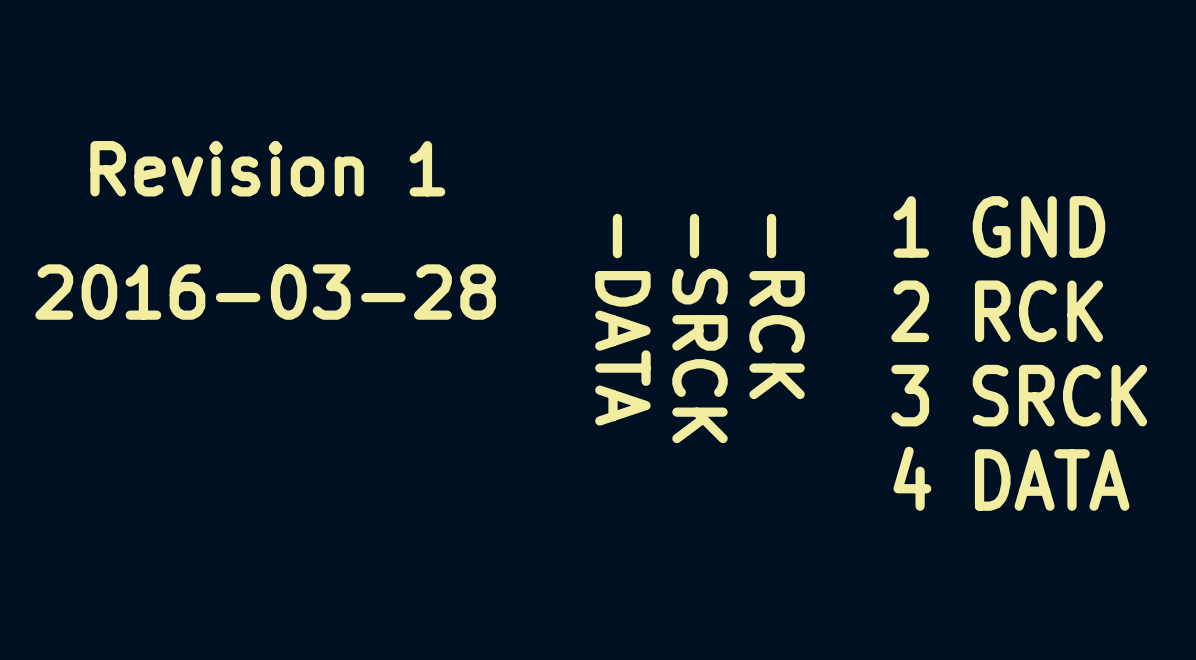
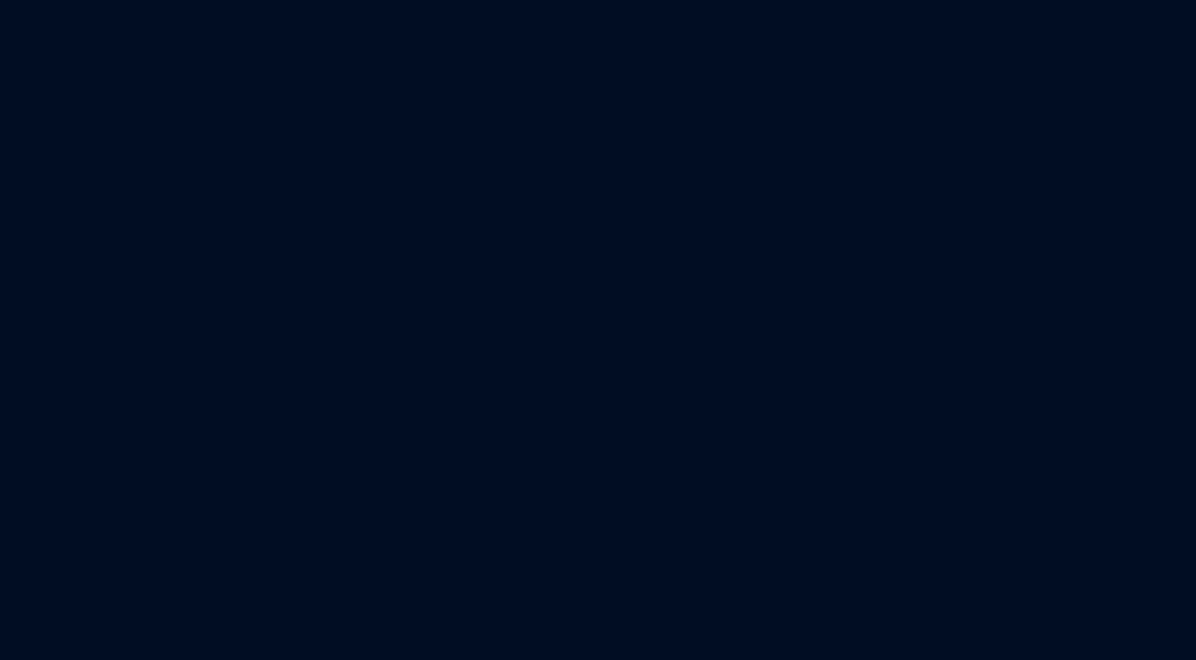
text: Revision 1 (267, 168) -> none
text: 1 GND (999, 226) -> none
text: 2016-03-28 (265, 292) -> none
text: -RCK (777, 306) -> none
text: 2 RCK (997, 311) -> none
text: -DATA (622, 319) -> none
text: -SRCK (699, 328) -> none
text: 3 SRCK (1019, 395) -> none
text: 4 DATA (1011, 478) -> none

